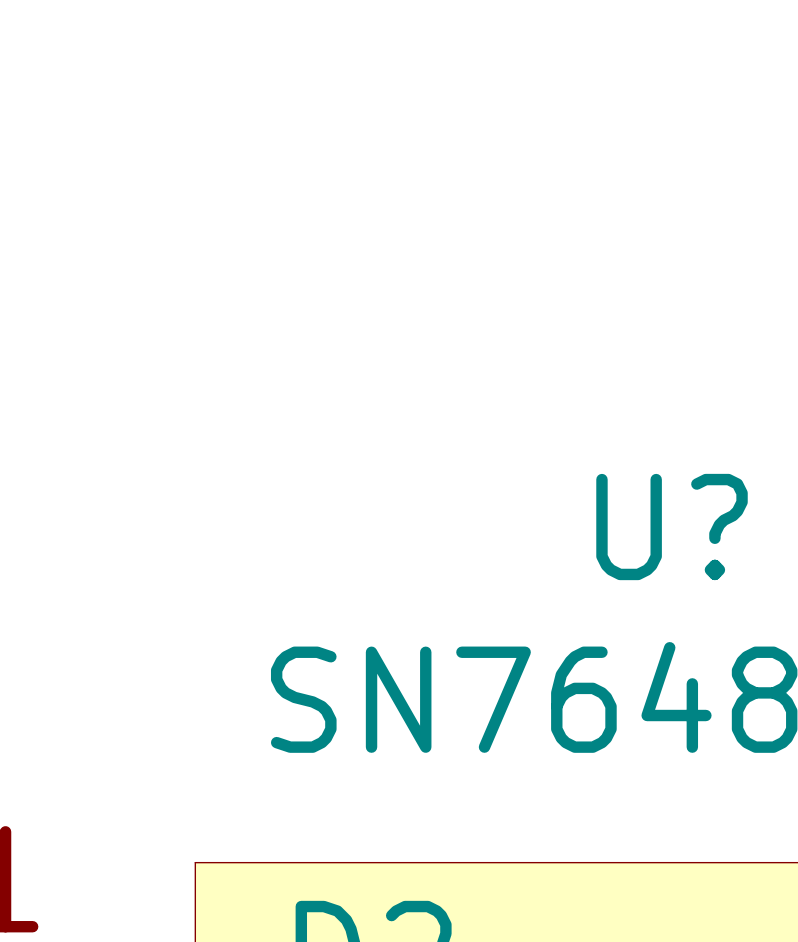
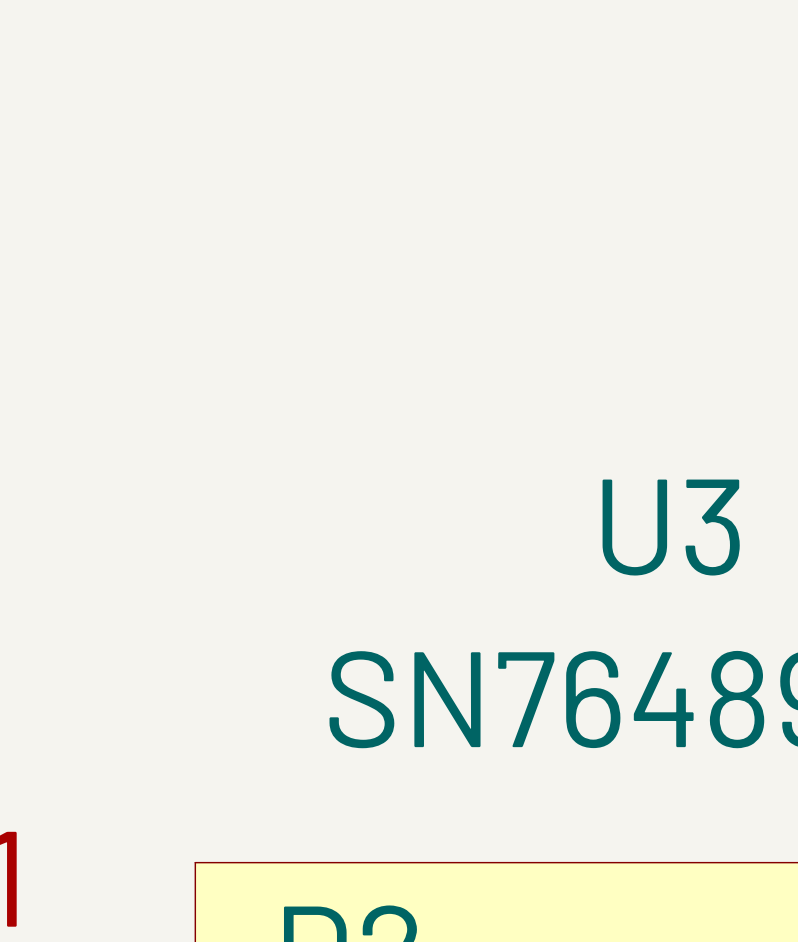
U? name: U? (672, 527) -> U3 (671, 527)

